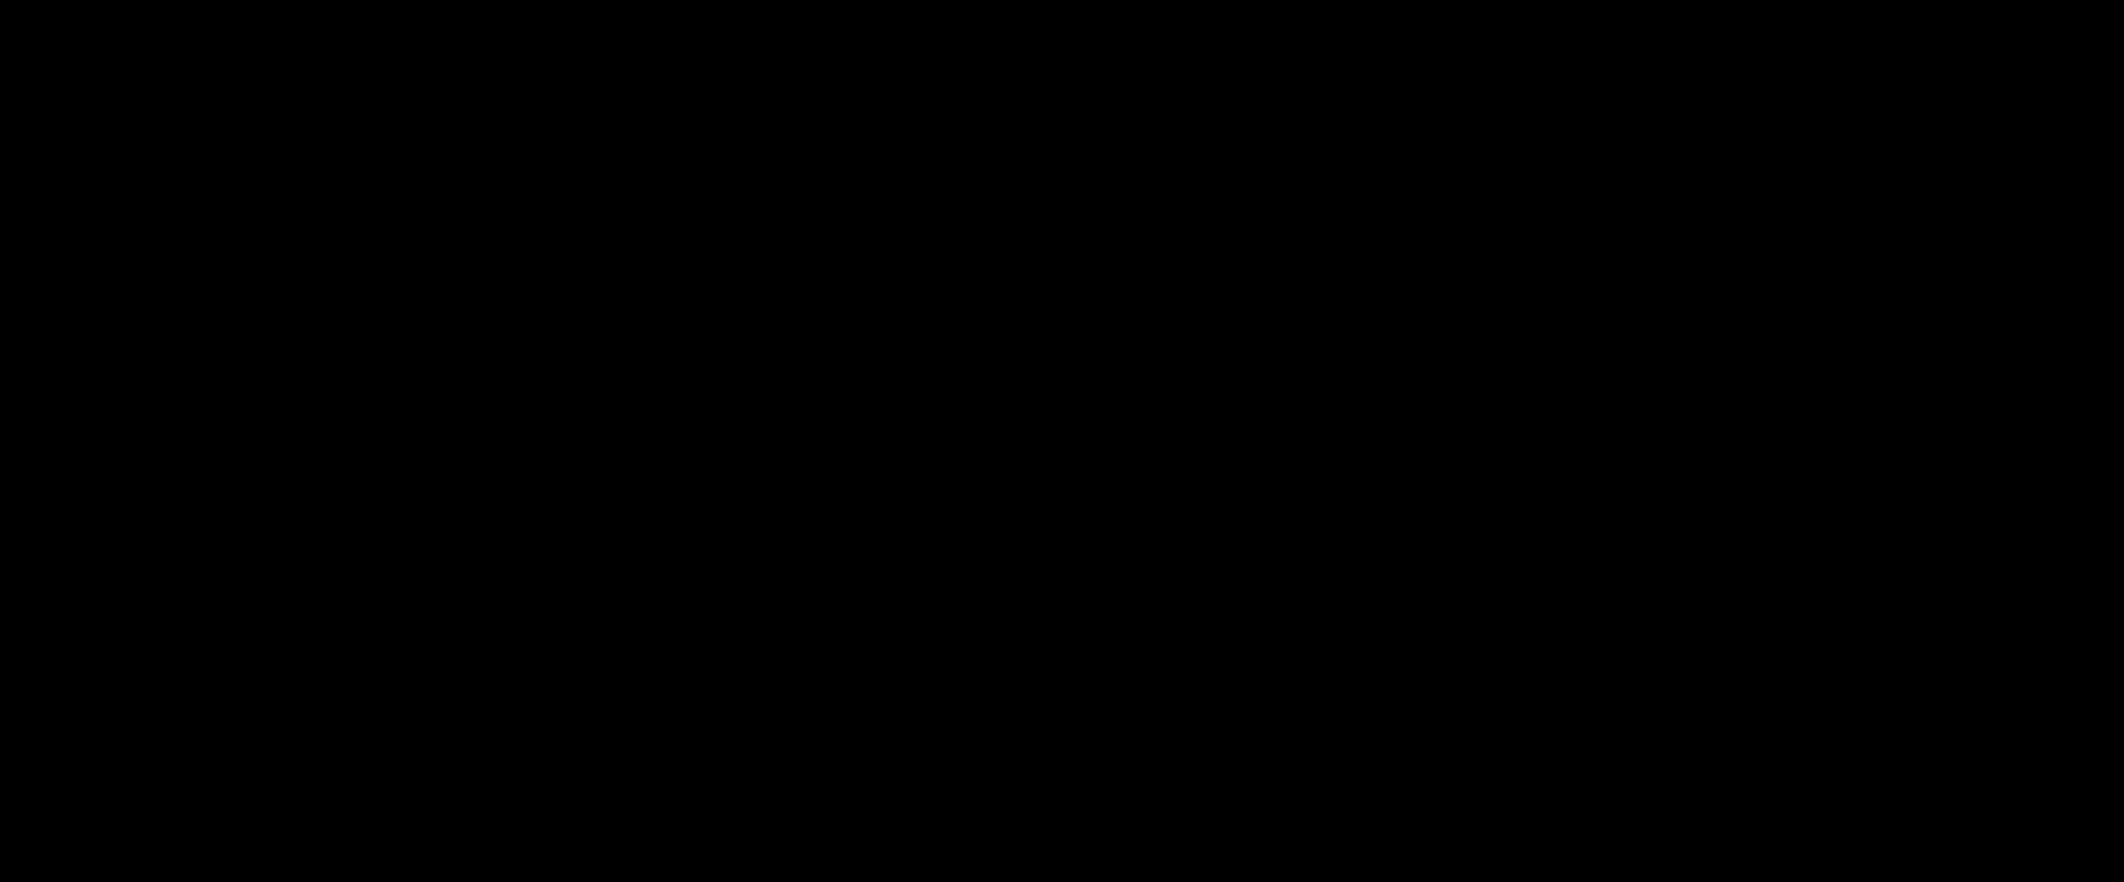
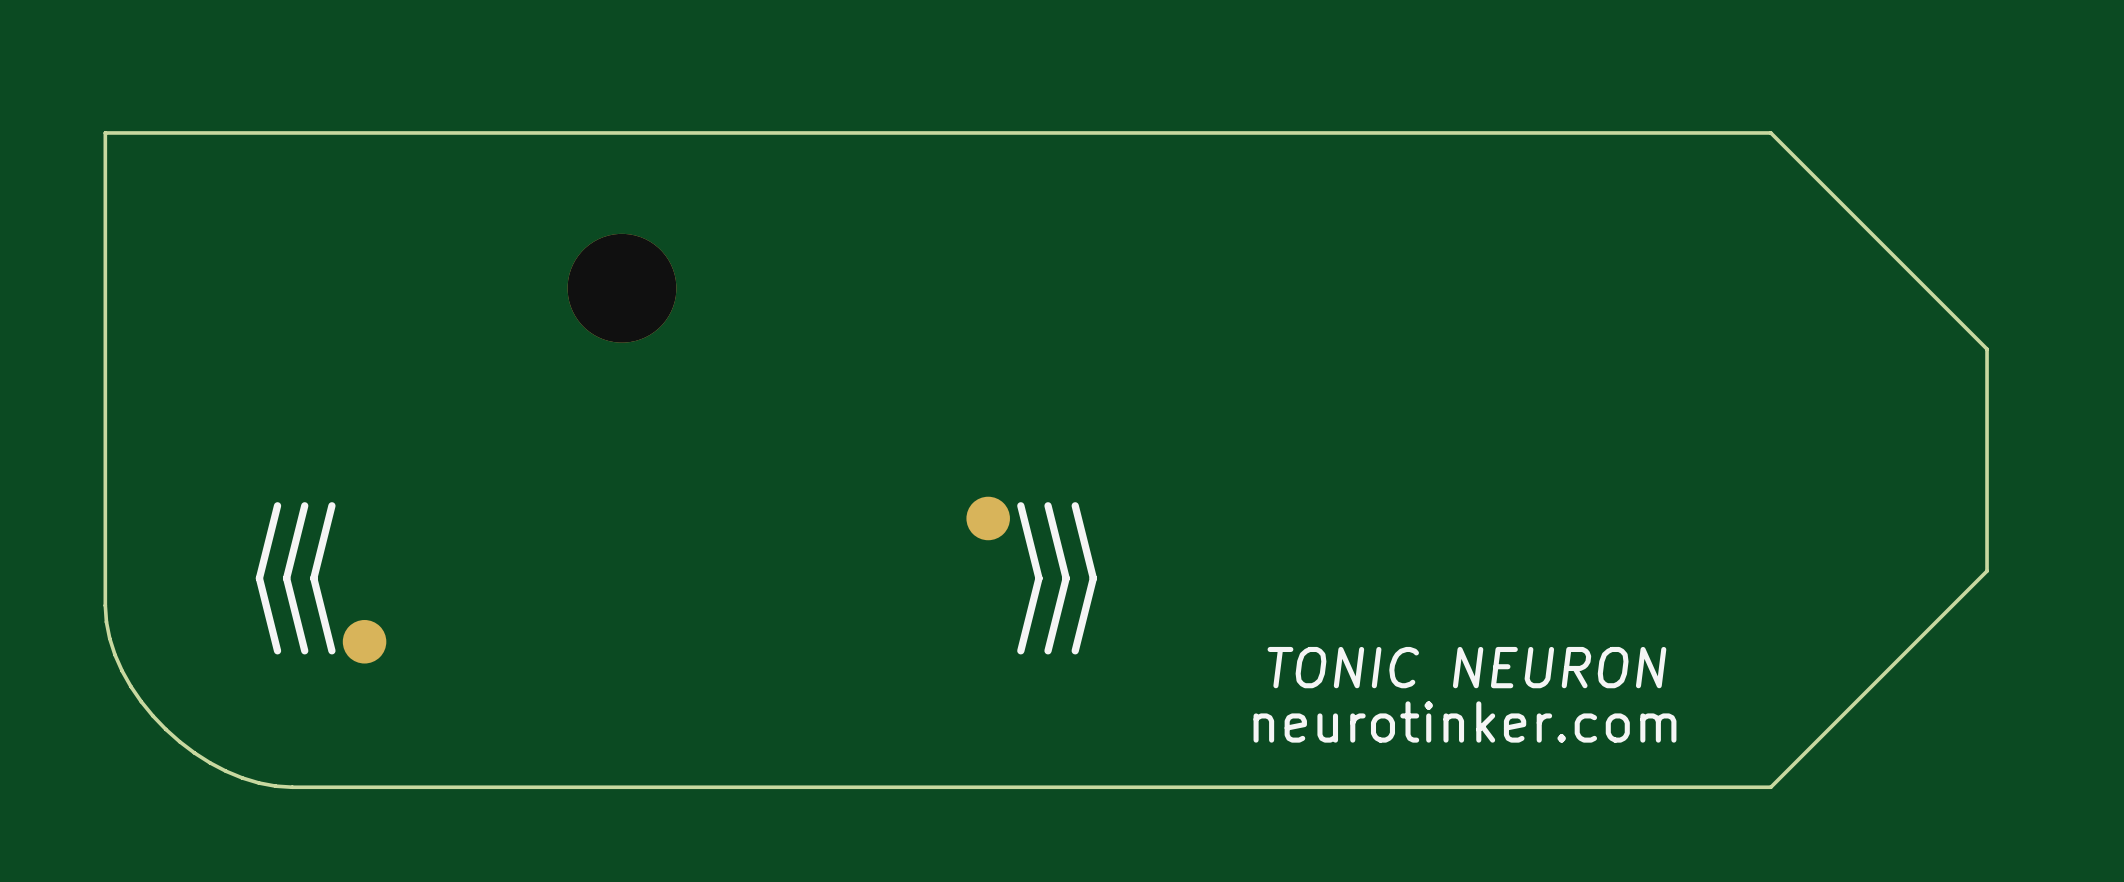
board edge: none -> (105, 132) (105, 605) (109, 638) (115, 654) (130, 686) (141, 701) (165, 729) (209, 762) (242, 778) (259, 783) (292, 787) (1770, 787) (1987, 571) (1987, 349) (1770, 132) (105, 132)
part: none -> (621, 288)
line: none -> (277, 505) (259, 578) (277, 650)
line: none -> (304, 505) (286, 578) (304, 650)
line: none -> (331, 505) (313, 578) (331, 650)
line: none -> (1020, 505) (1038, 578) (1020, 650)
line: none -> (1048, 505) (1066, 578) (1048, 650)
line: none -> (1075, 505) (1093, 578) (1075, 650)
part: none -> (988, 518)
part: none -> (364, 641)
text: none -> TONIC NEURON (1466, 667)
text: none -> neurotinker.com (1464, 721)

